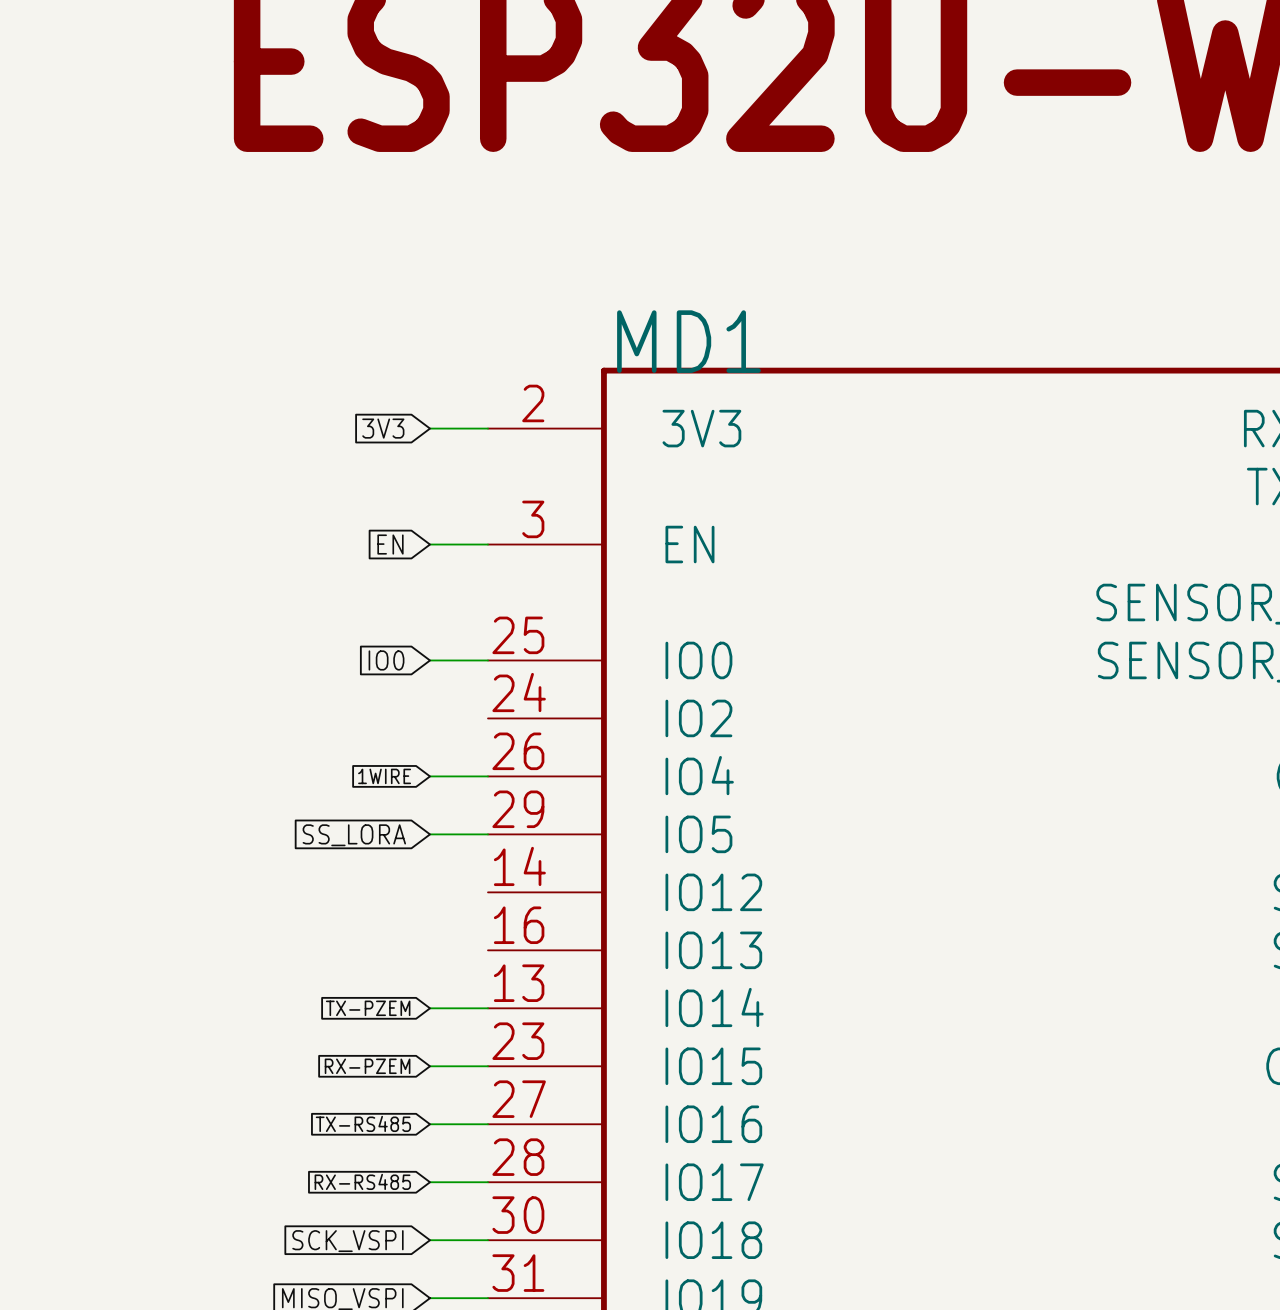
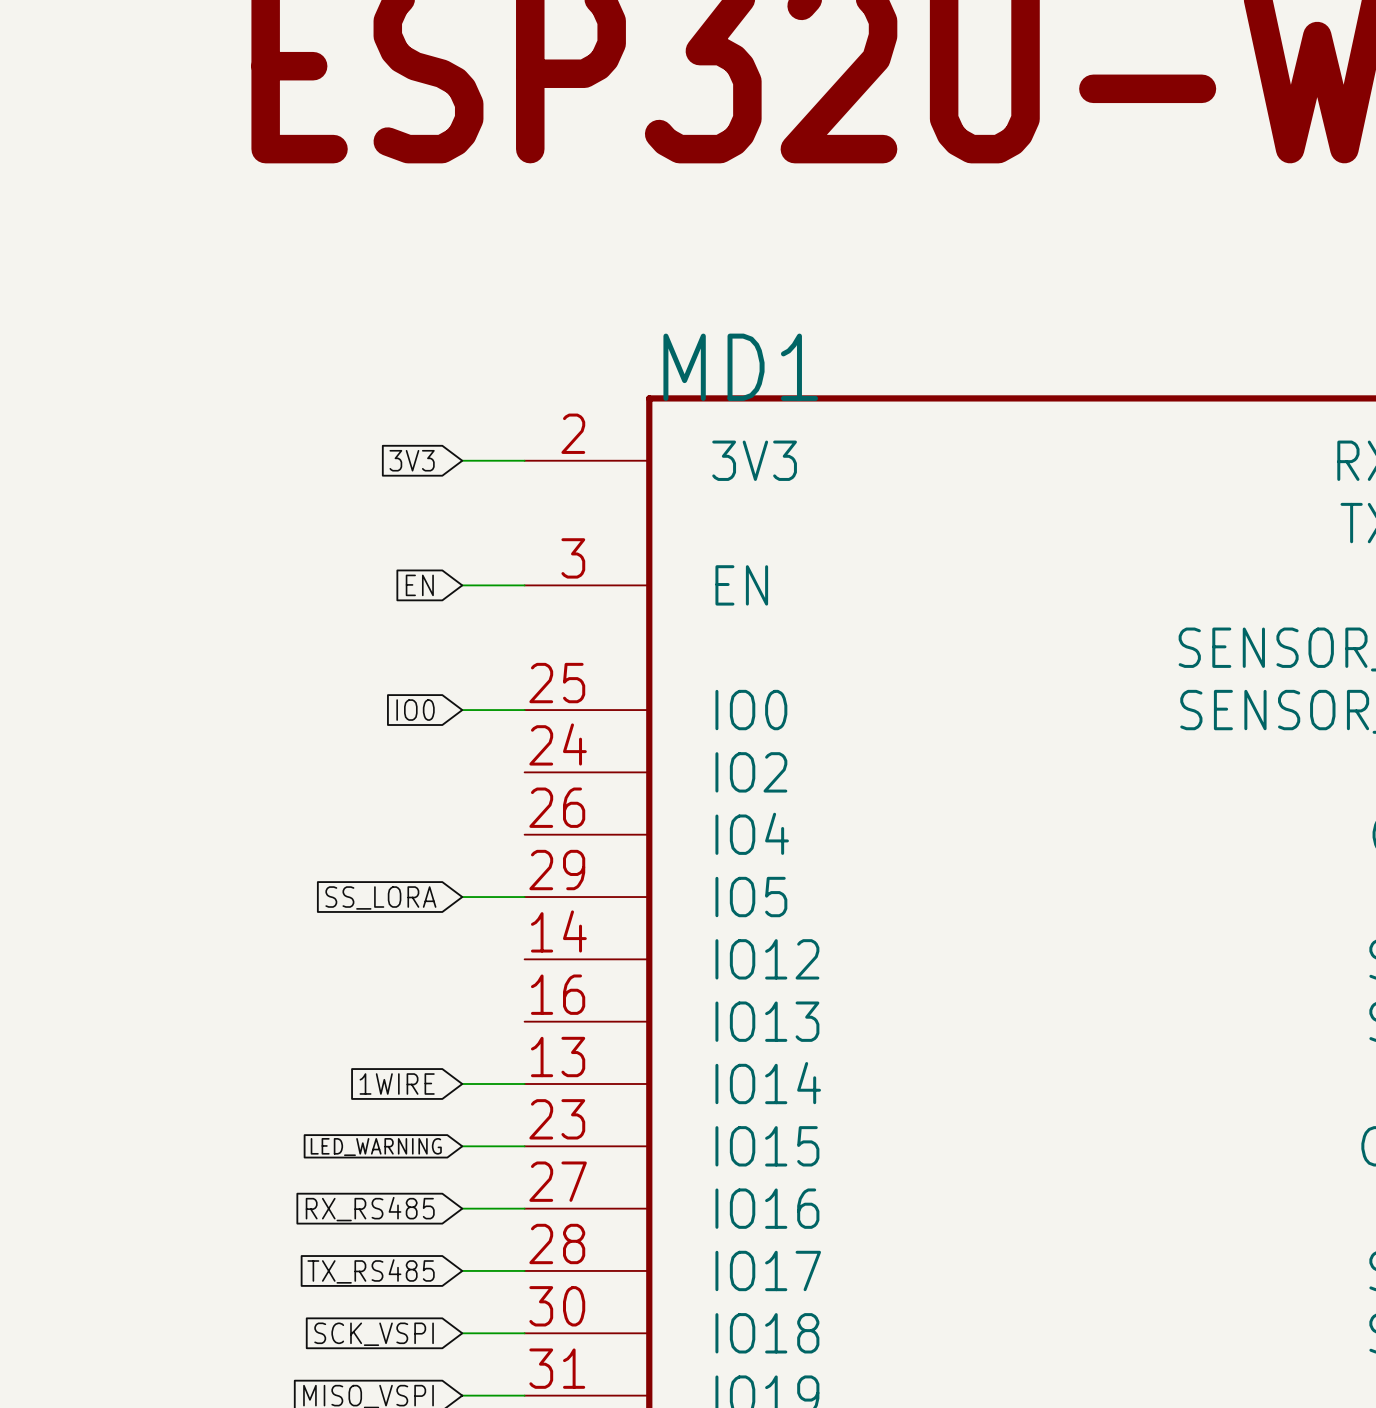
global label: 1WIRE (384, 776) -> none
wire: (430, 776) (488, 776) -> none
global label: TX-PZEM (368, 1008) -> 1WIRE (397, 1084)
global label: RX-PZEM (367, 1066) -> LED_WARNING (376, 1147)
global label: TX-RS485 (363, 1123) -> RX_RS485 (370, 1209)
global label: RX-RS485 (362, 1181) -> TX_RS485 (371, 1271)

